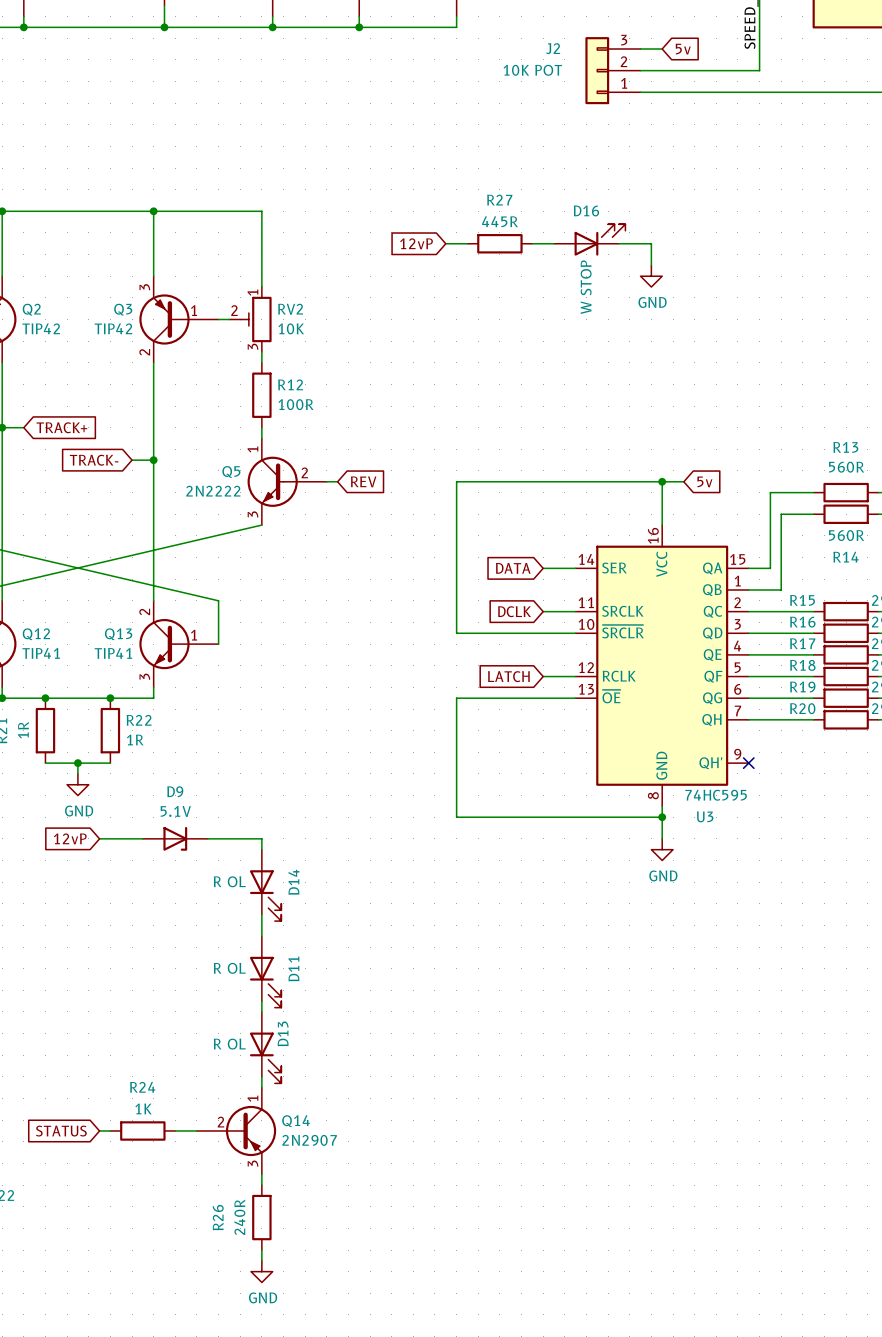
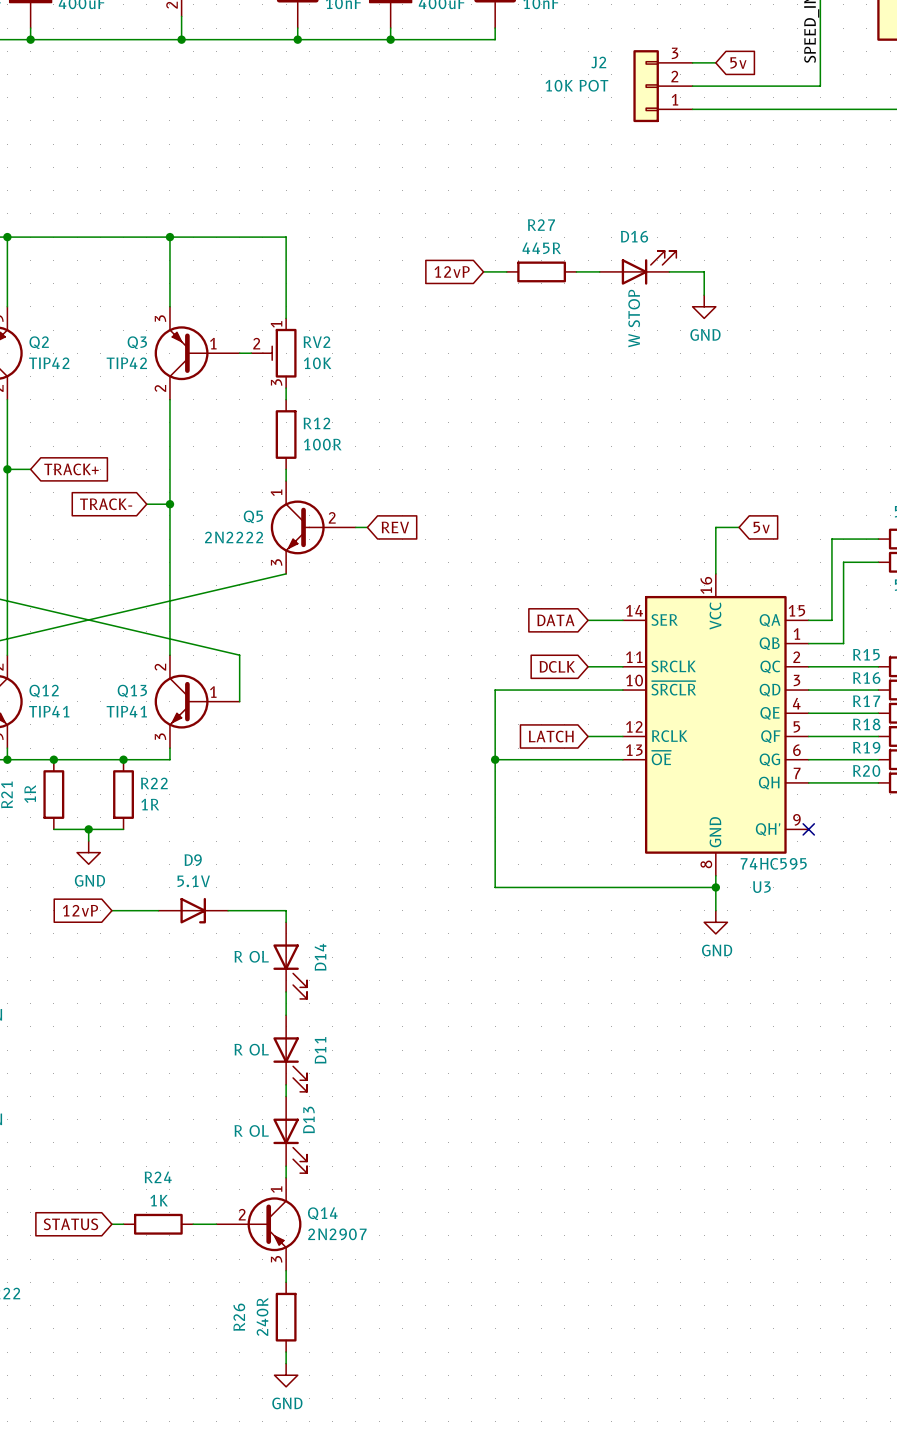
wire: (662, 481) (456, 481) (456, 633) -> (495, 759) (495, 690)
junction: (662, 481) -> none
junction: none -> (495, 759)

